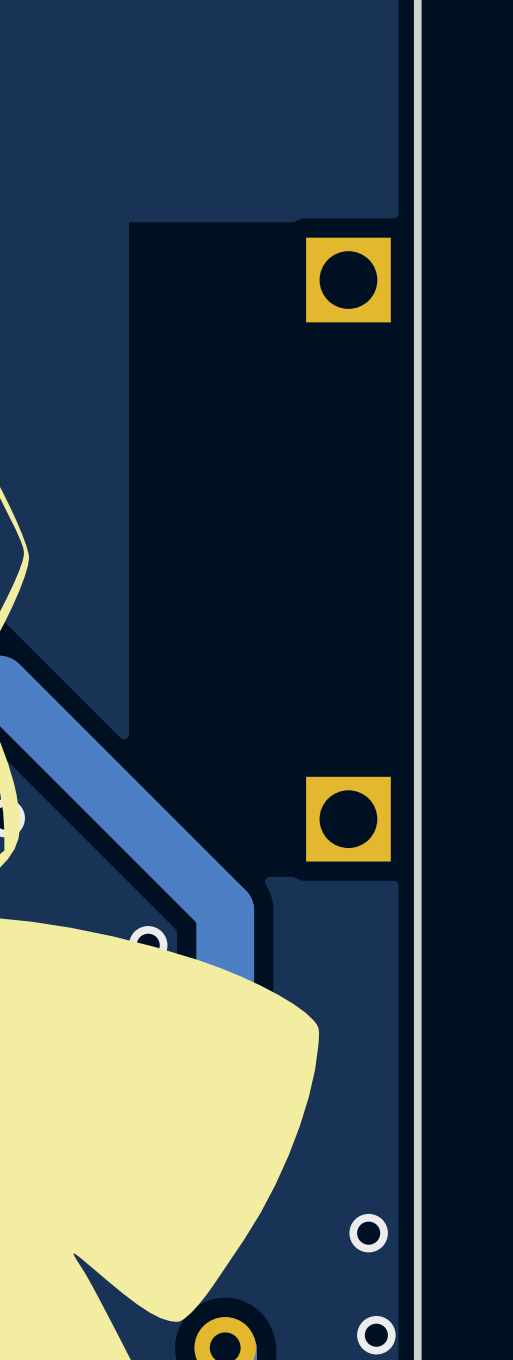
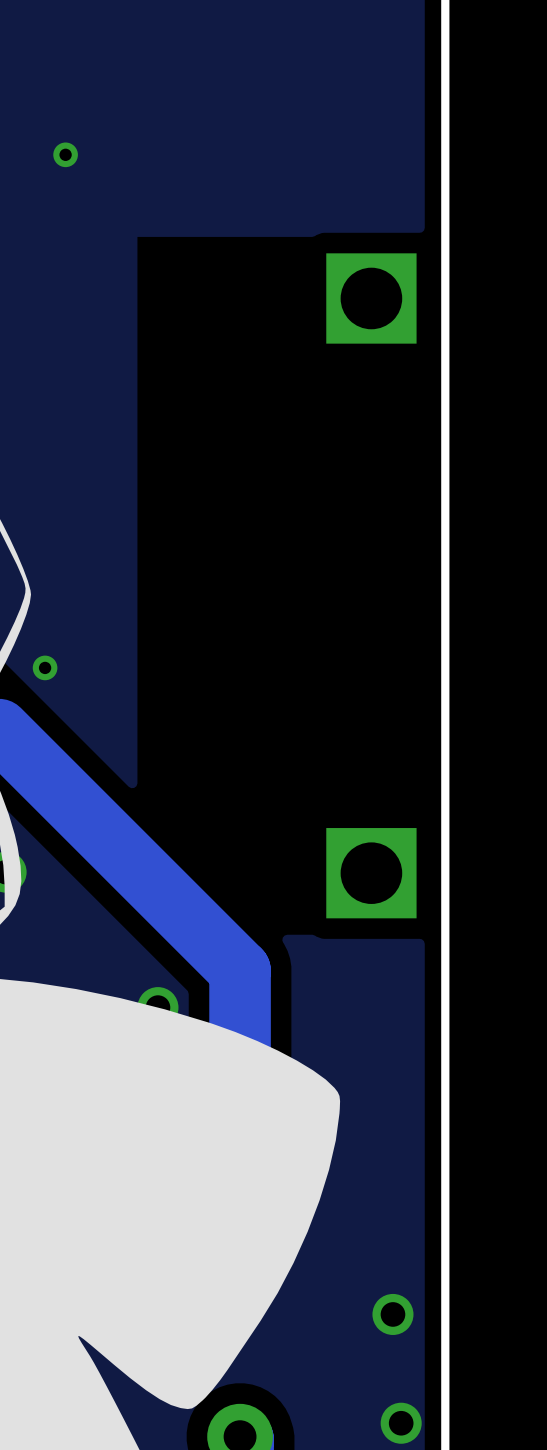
via: none -> (65, 154)
via: none -> (45, 667)

